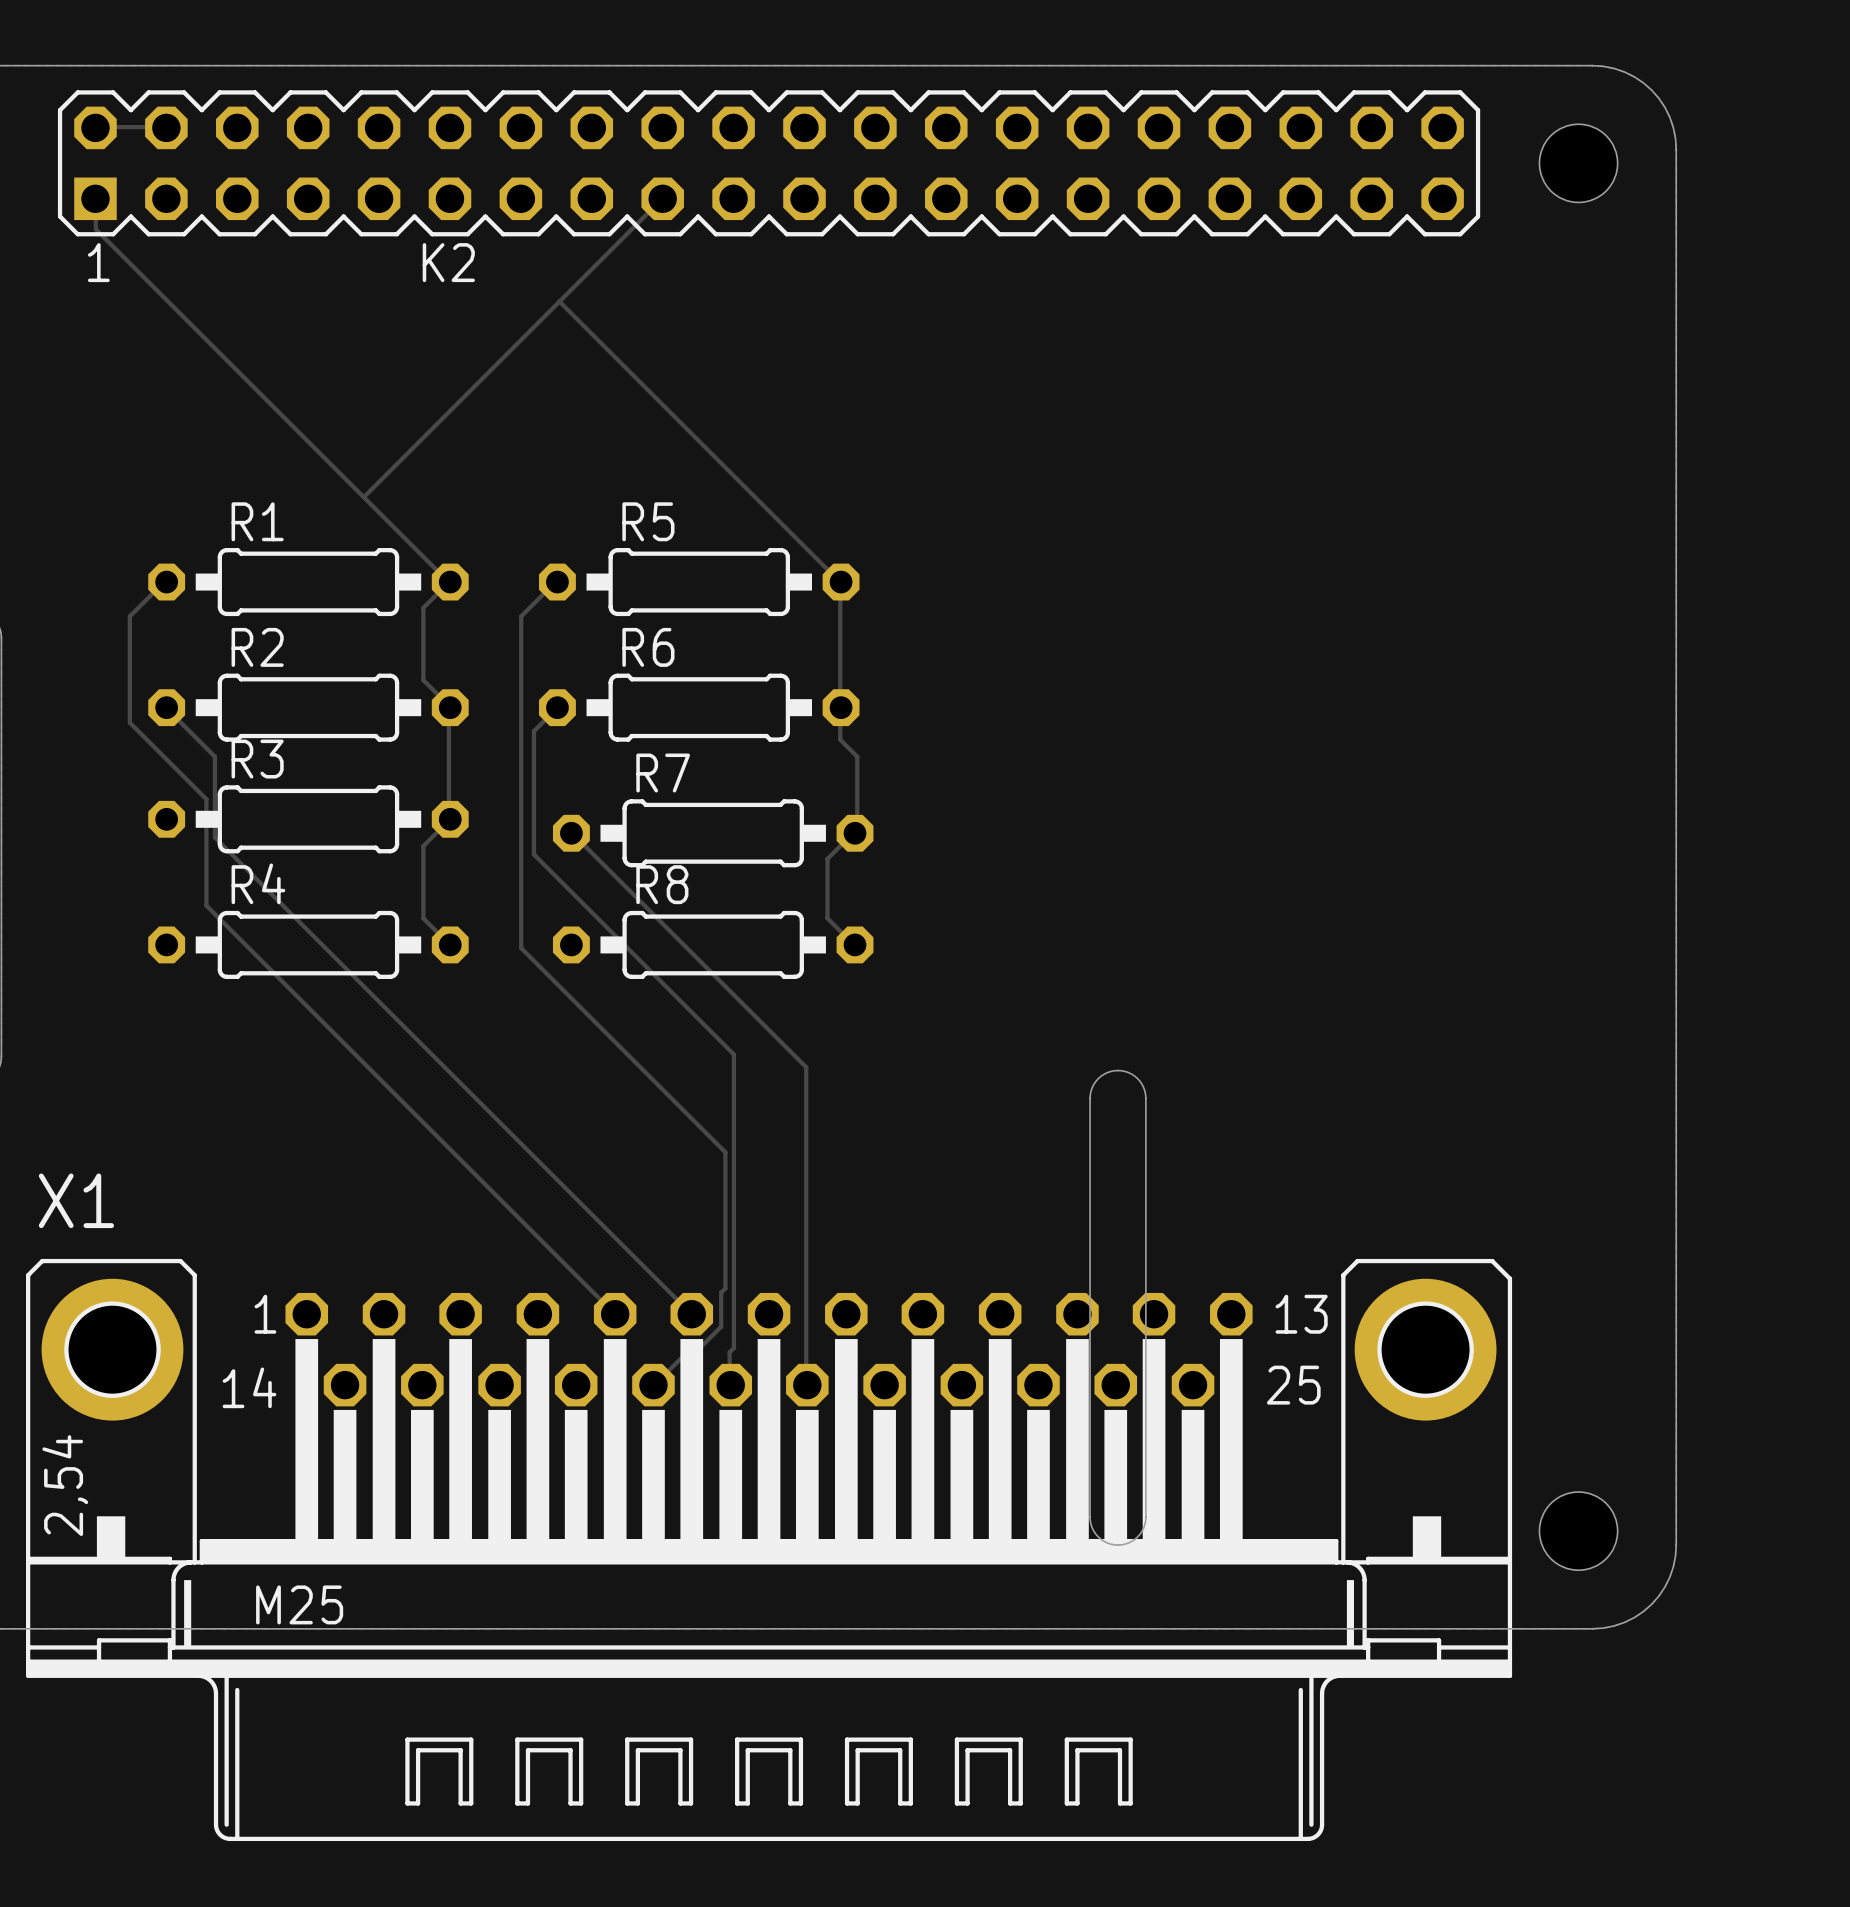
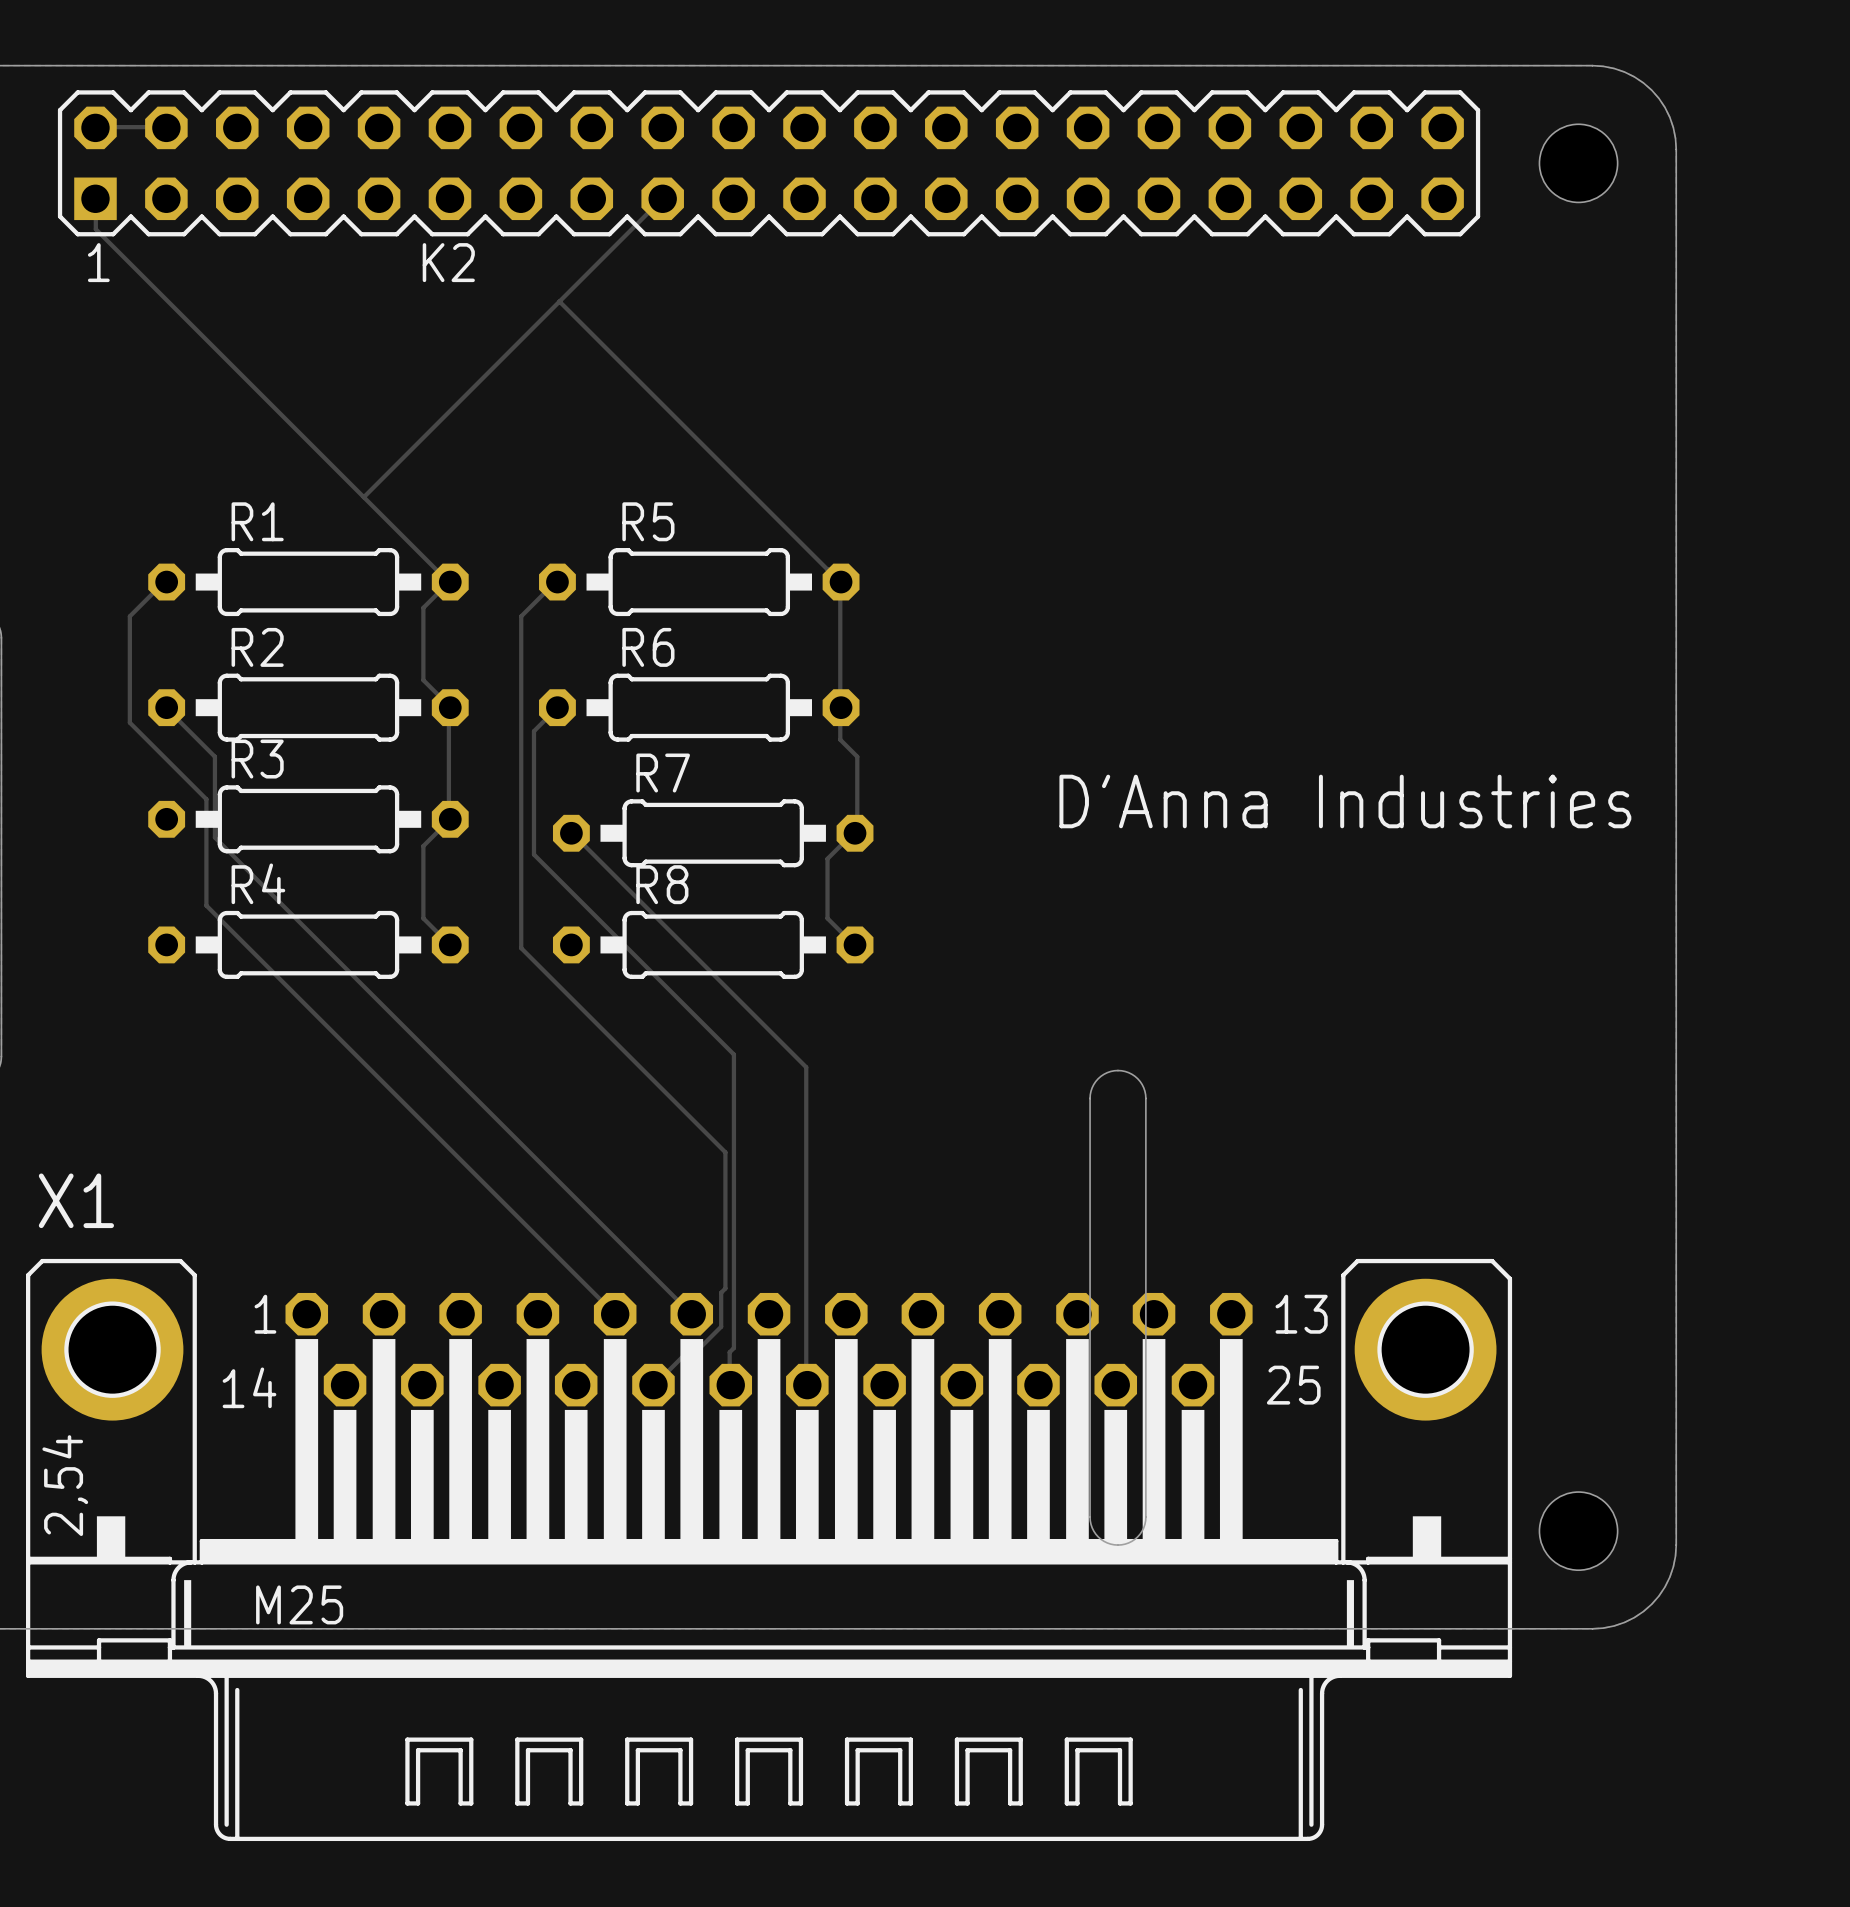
text: none -> D'Anna Industries (1345, 801)

